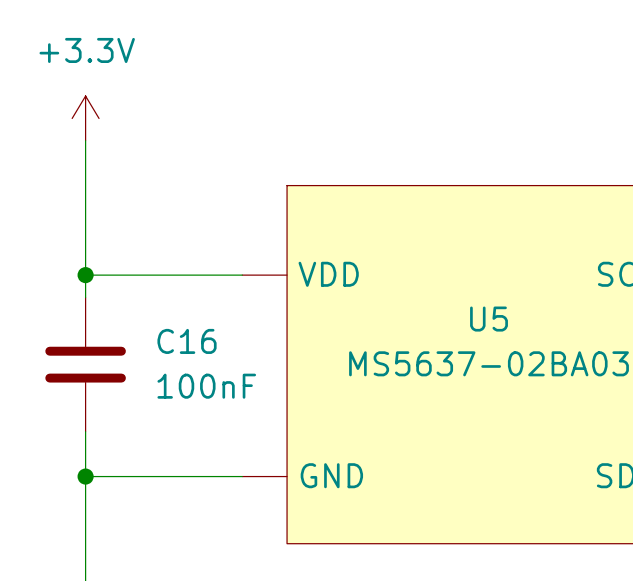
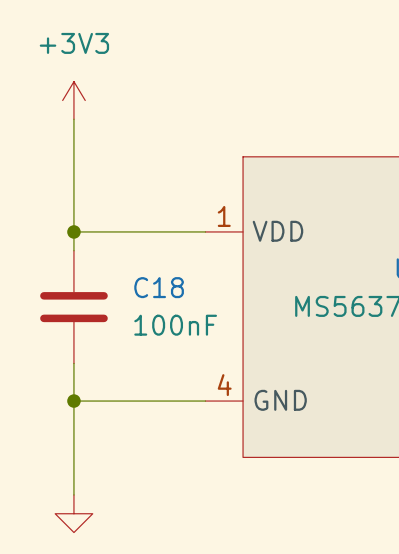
power symbol: +3.3V (85, 118) -> +3V3 (73, 100)
U5 pin number: none -> 1 (224, 216)
C16 name: C16 (187, 341) -> C18 (159, 287)
U5 pin number: none -> 4 (224, 385)

